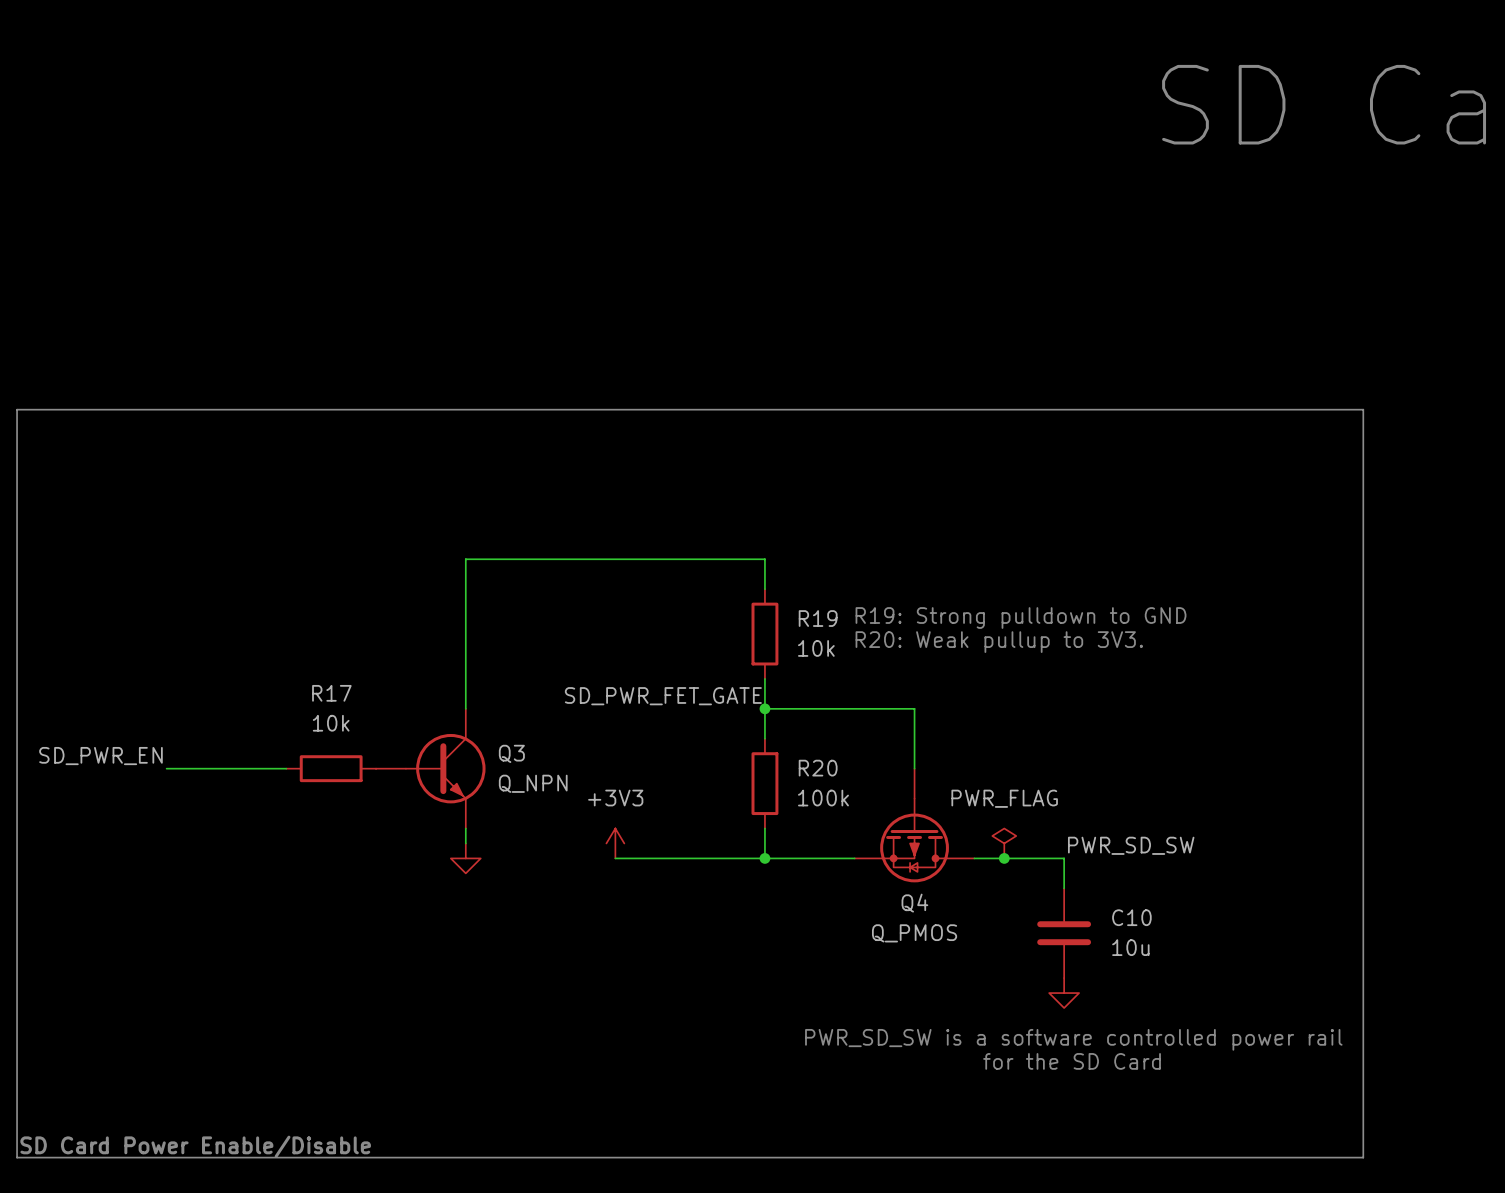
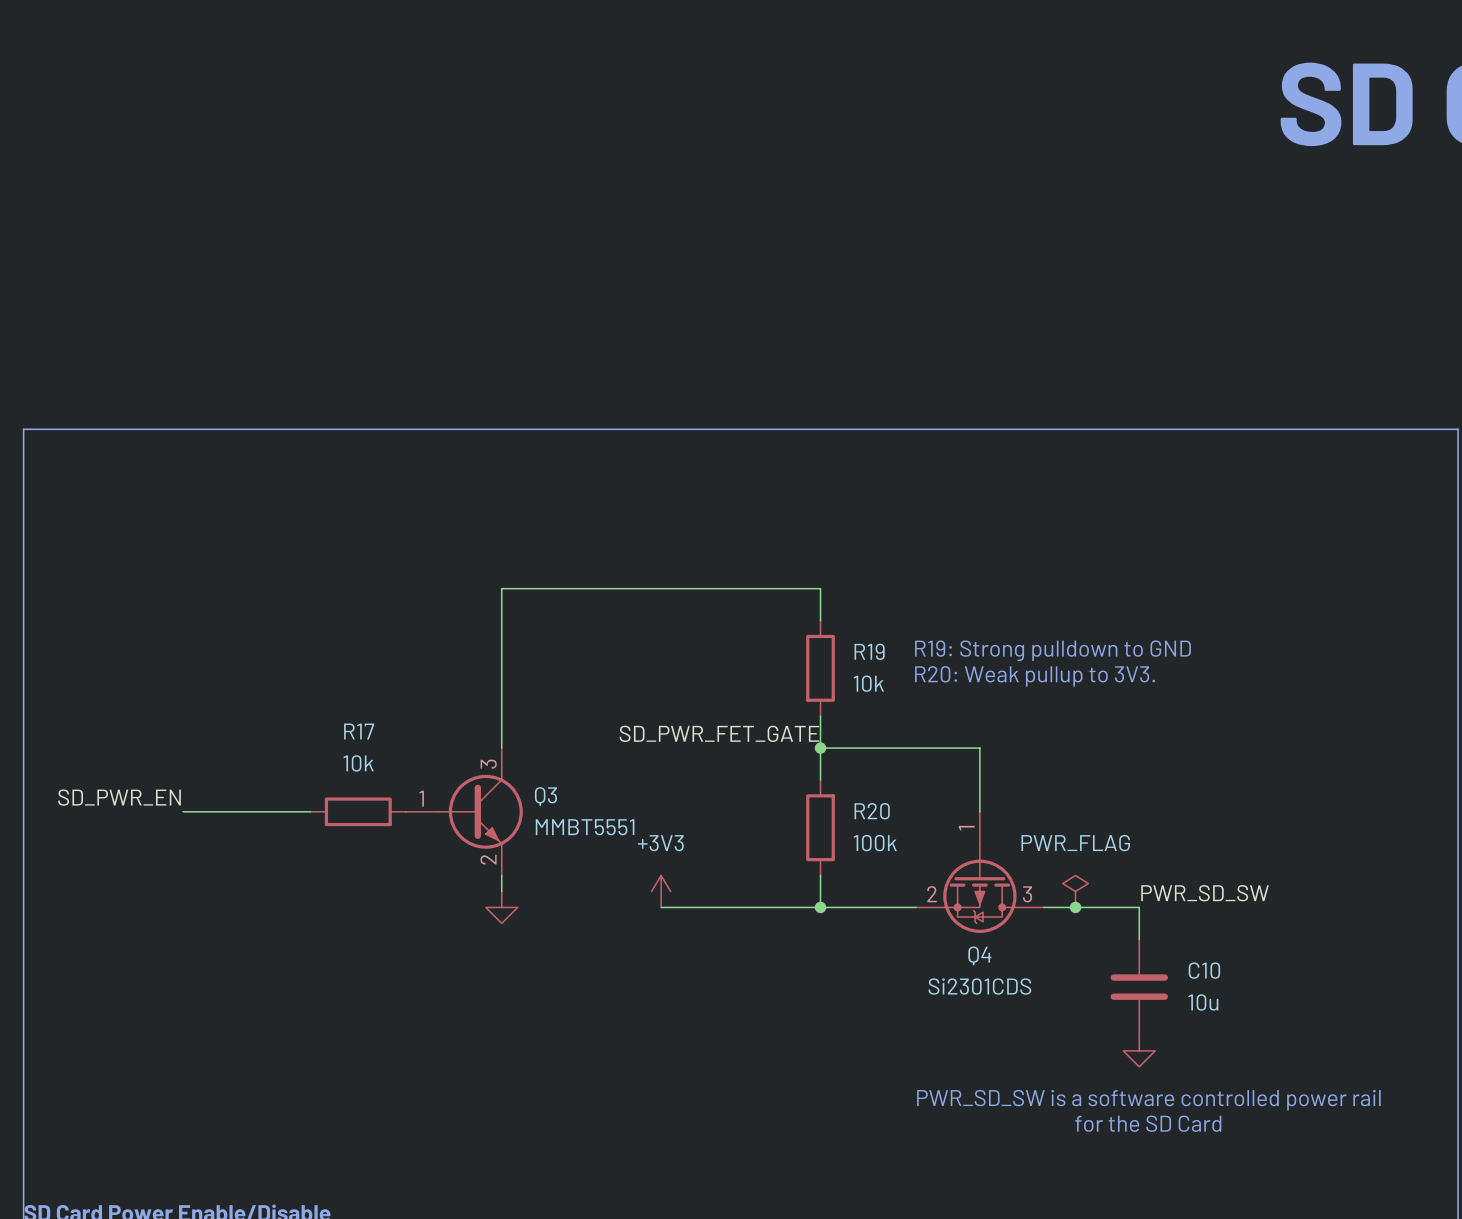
Q3 pin number: none -> 3 (488, 764)
Q3 pin number: none -> 1 (421, 798)
Q4 symbol: [854, 768, 975, 883] -> [916, 811, 1044, 933]
Q3 value: Q_NPN (533, 783) -> MMBT5551 (585, 827)
Q3 pin number: none -> 2 (488, 859)
Q4 value: Q_PMOS (914, 933) -> Si2301CDS (979, 986)

